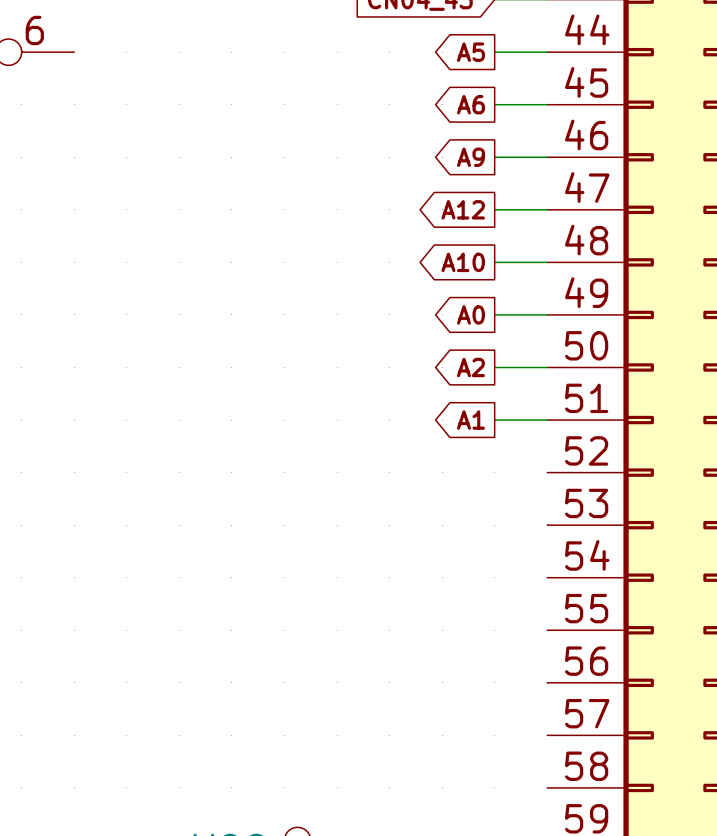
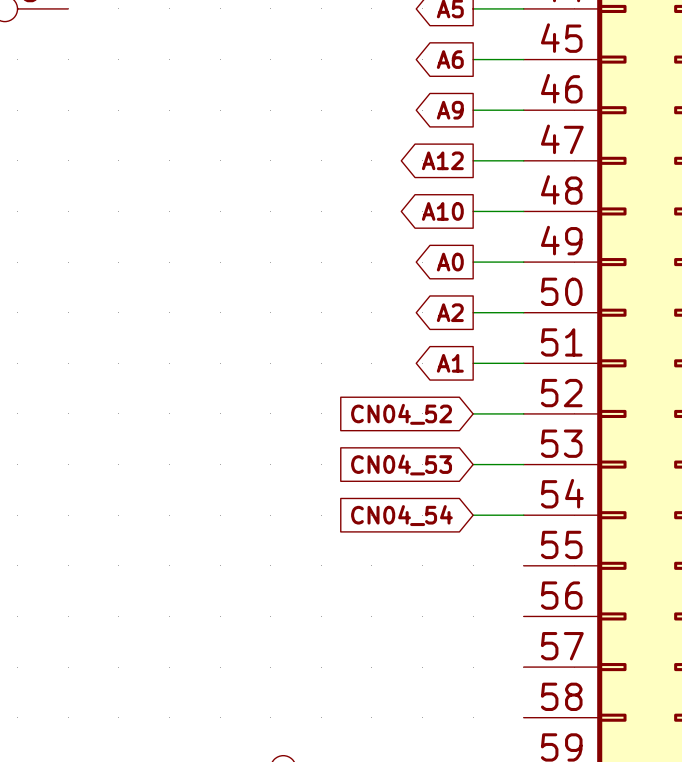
global label: none -> CN04_52 (401, 414)
wire: none -> (473, 413) (523, 413)
global label: none -> CN04_53 (401, 464)
wire: none -> (473, 464) (523, 464)
wire: none -> (473, 515) (523, 515)
global label: none -> CN04_54 (401, 515)

